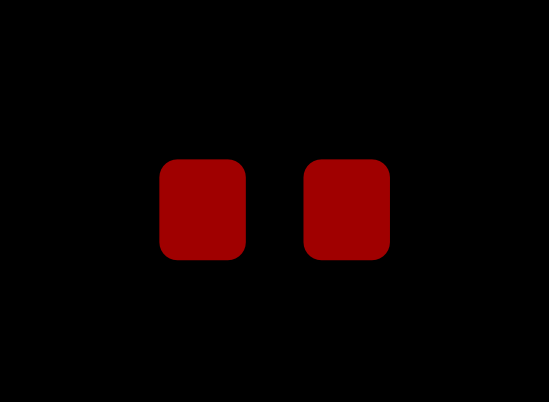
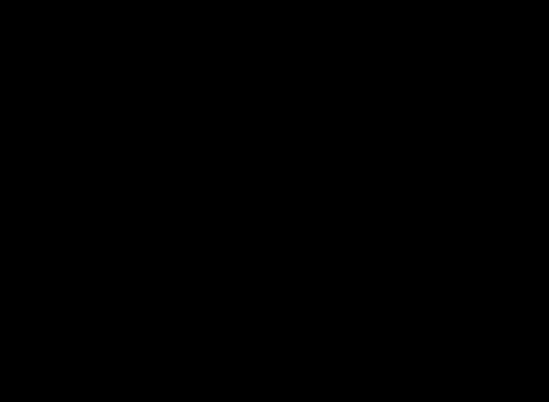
part: (274, 209) -> none

